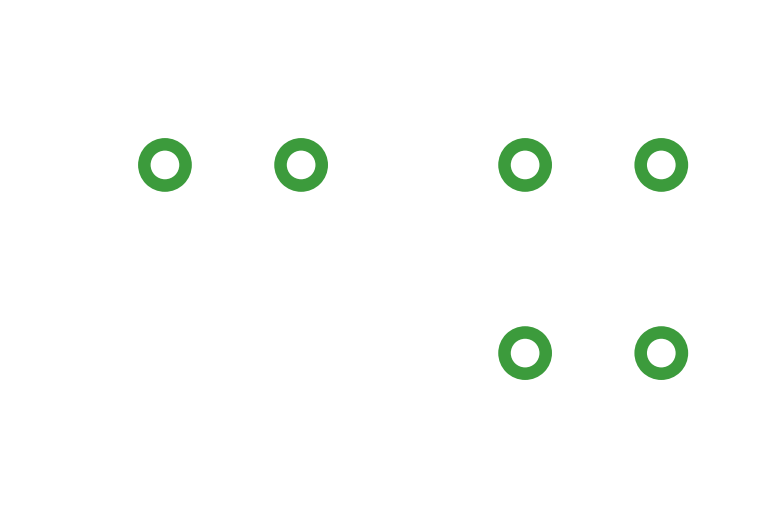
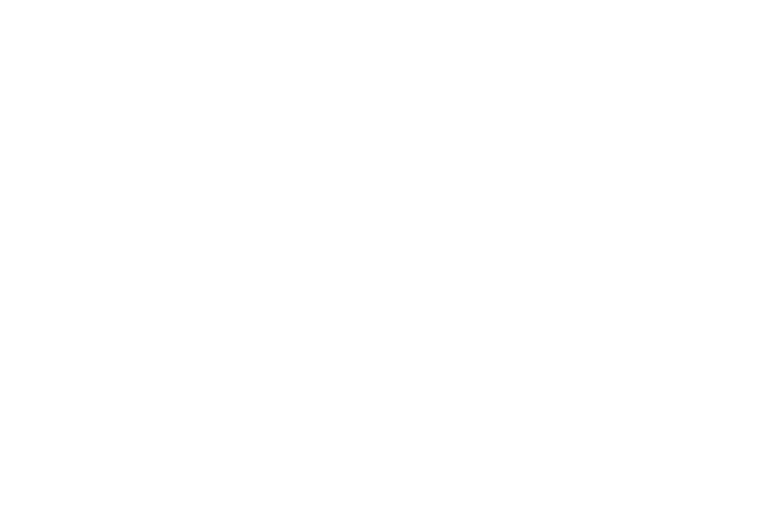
part: (233, 164) -> none
part: (593, 164) -> none
part: (593, 353) -> none

